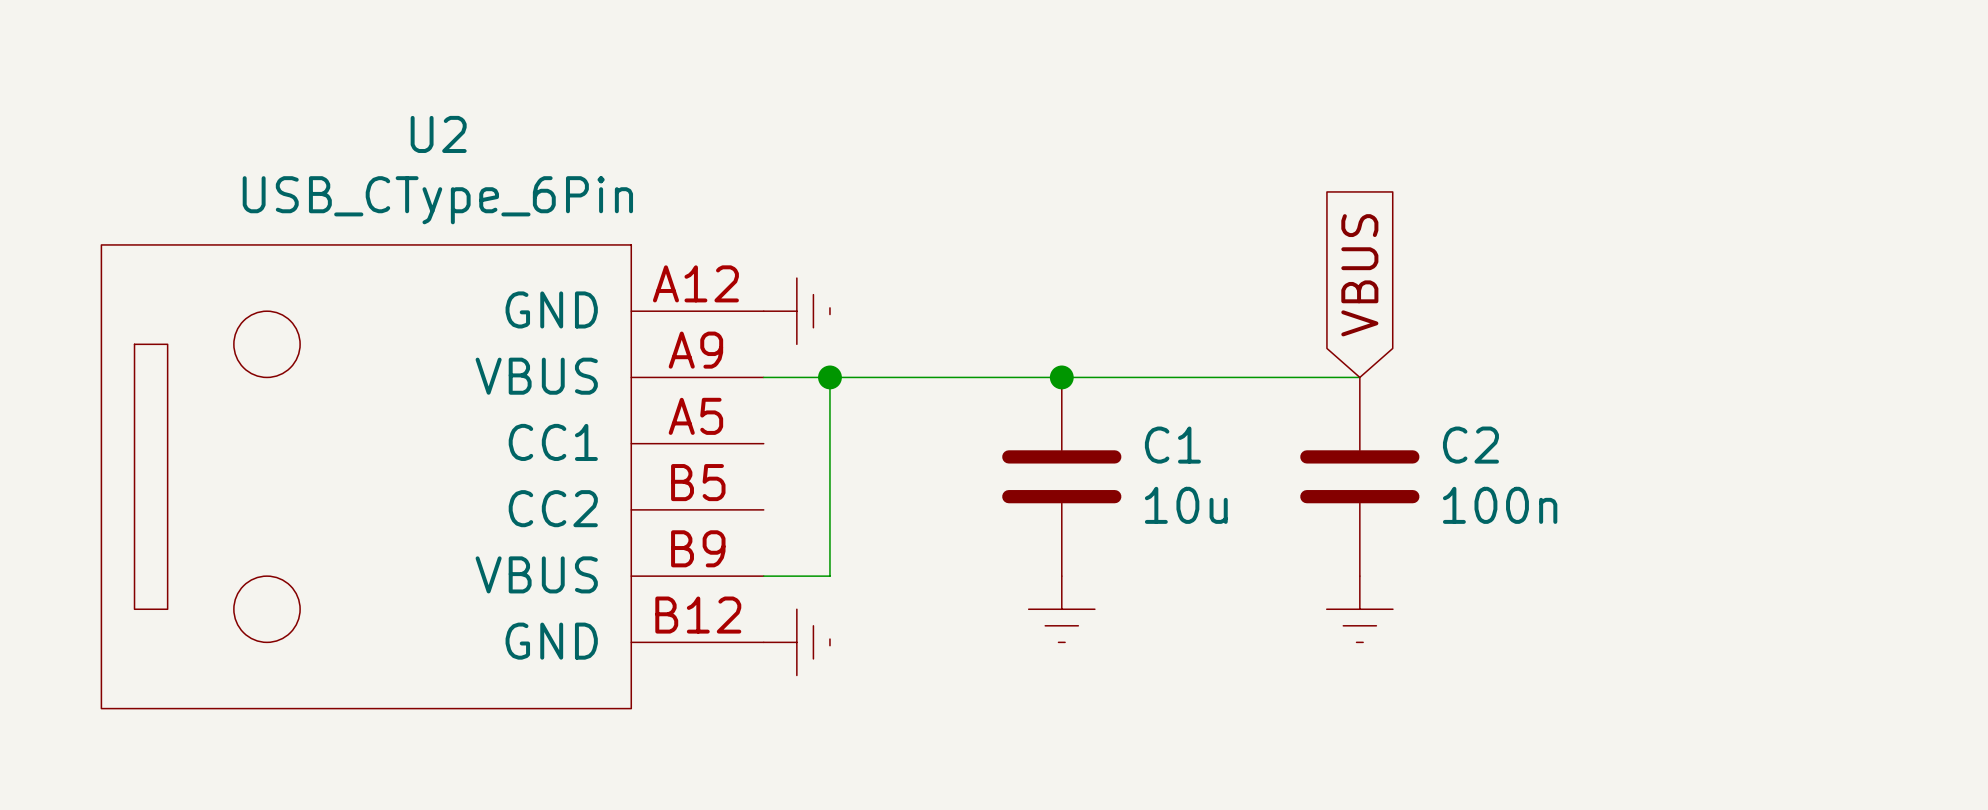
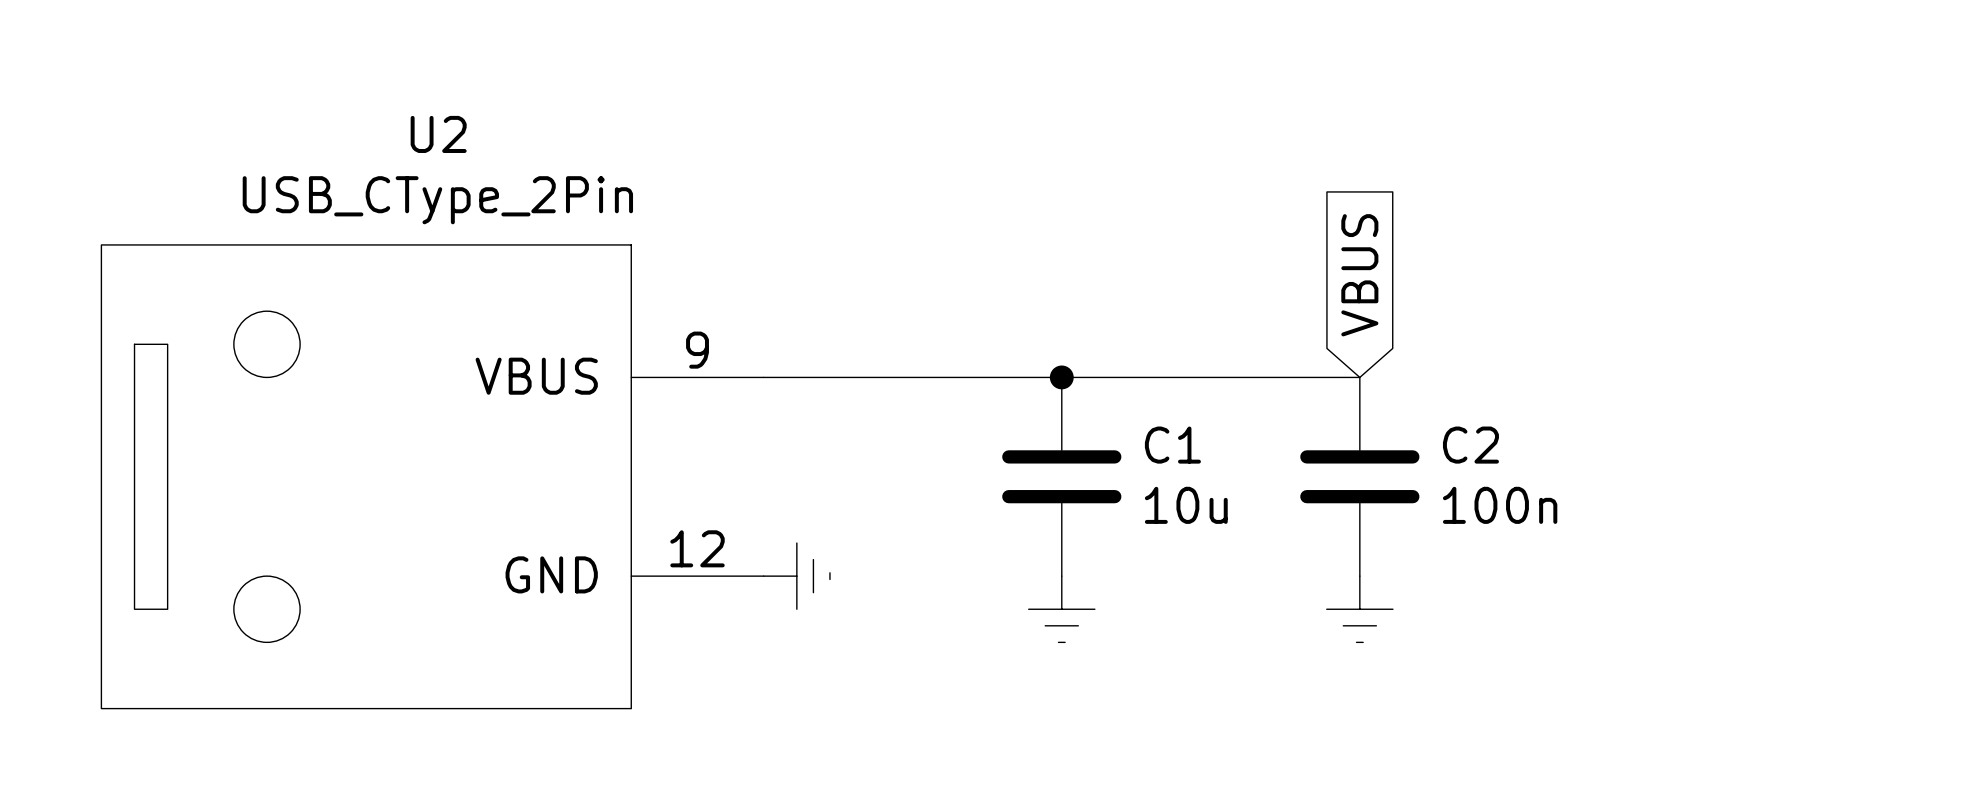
U2 value: USB_CType_6Pin (437, 200) -> USB_CType_2Pin (437, 200)
U2 symbol: [101, 244, 764, 709] -> [101, 244, 764, 709]
power symbol: (796, 311) -> none
wire: (829, 377) (829, 576) (763, 576) -> none
junction: (829, 377) -> none
power symbol position: (796, 642) -> (796, 576)

